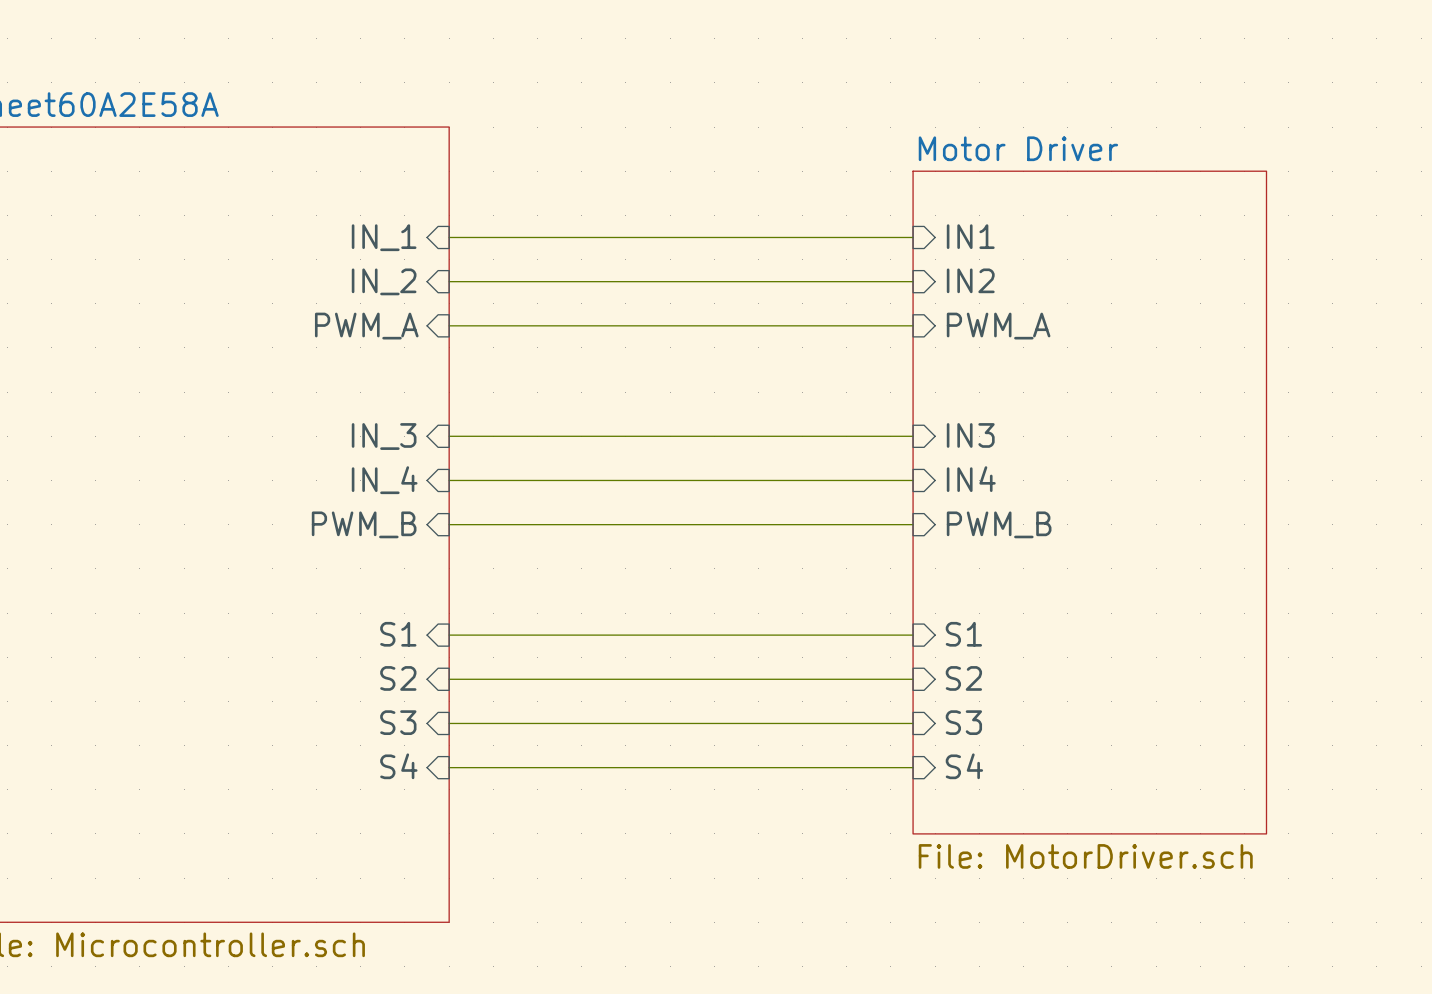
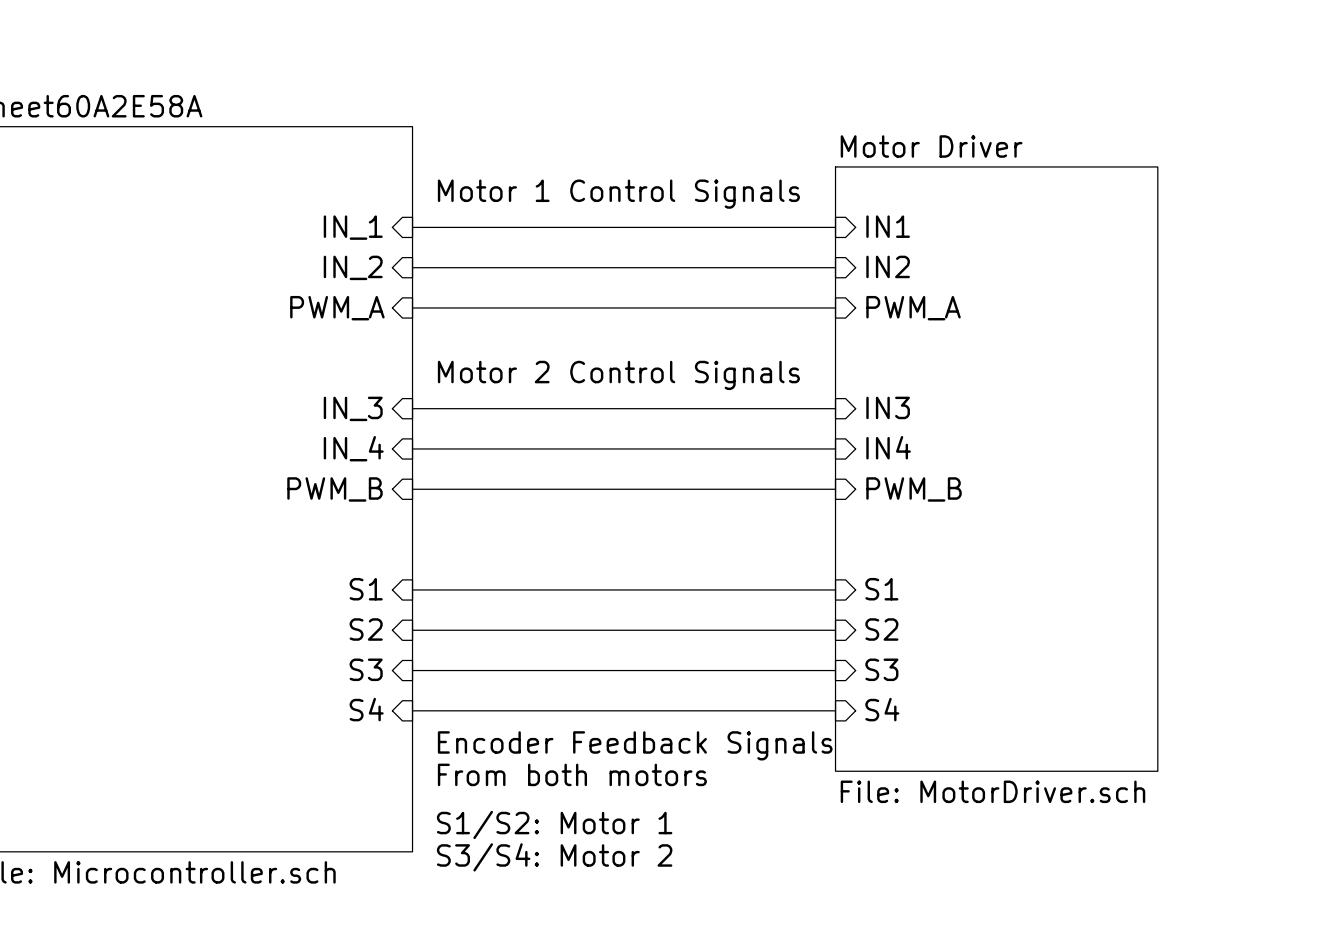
text: none -> Motor 1 Control Signals (618, 194)
text: none -> Motor 2 Control Signals (618, 375)
text: none -> Encoder Feedback Signals (635, 745)
text: none -> From both motors (572, 774)
text: none -> S1/S2: Motor 1 (554, 824)
text: none -> S3/S4: Motor 2 (554, 857)

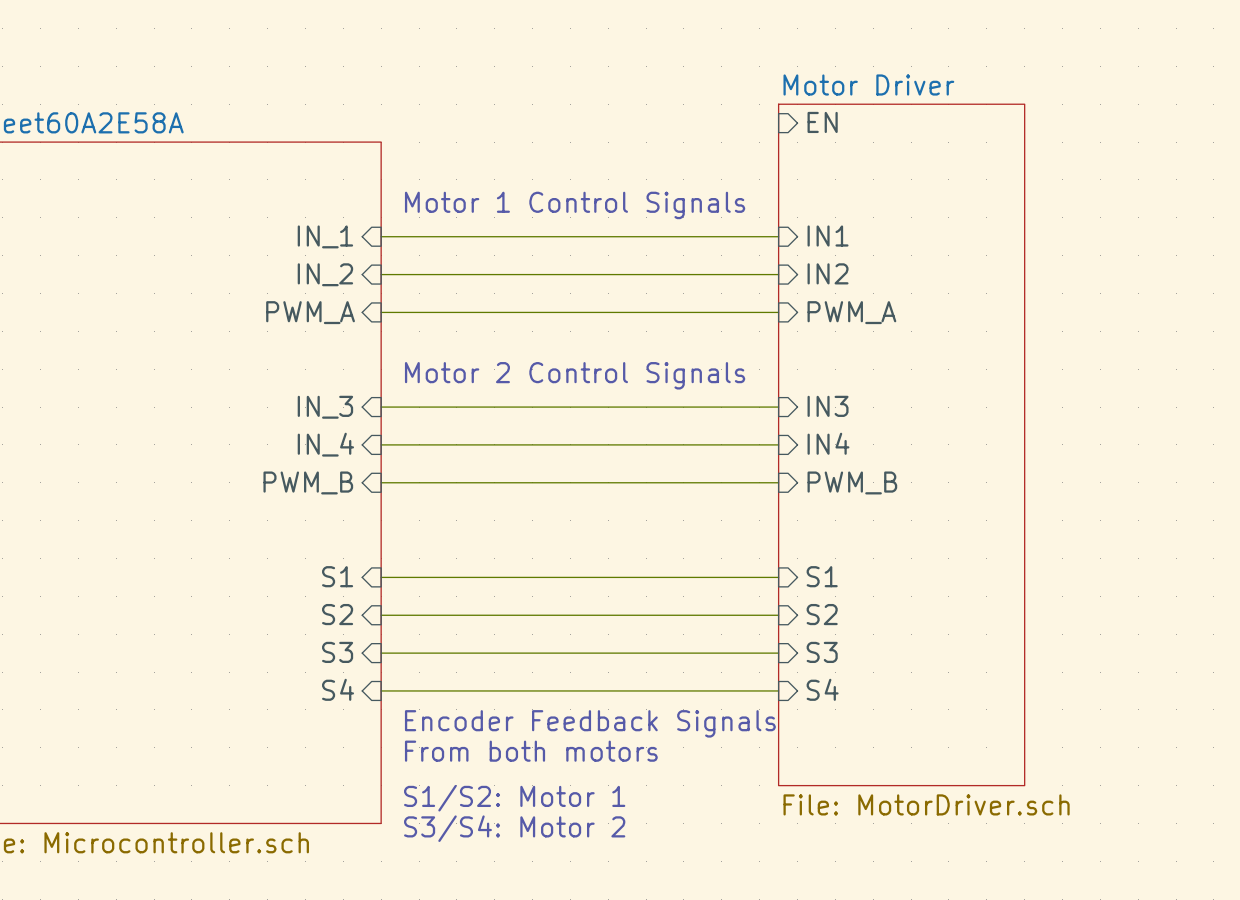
sheet pin: none -> EN (822, 122)
sheet Motor Driver: none -> File: MotorDriver.sch (901, 444)
sheet Motor Driver: File: MotorDriver.sch (996, 469) -> none

